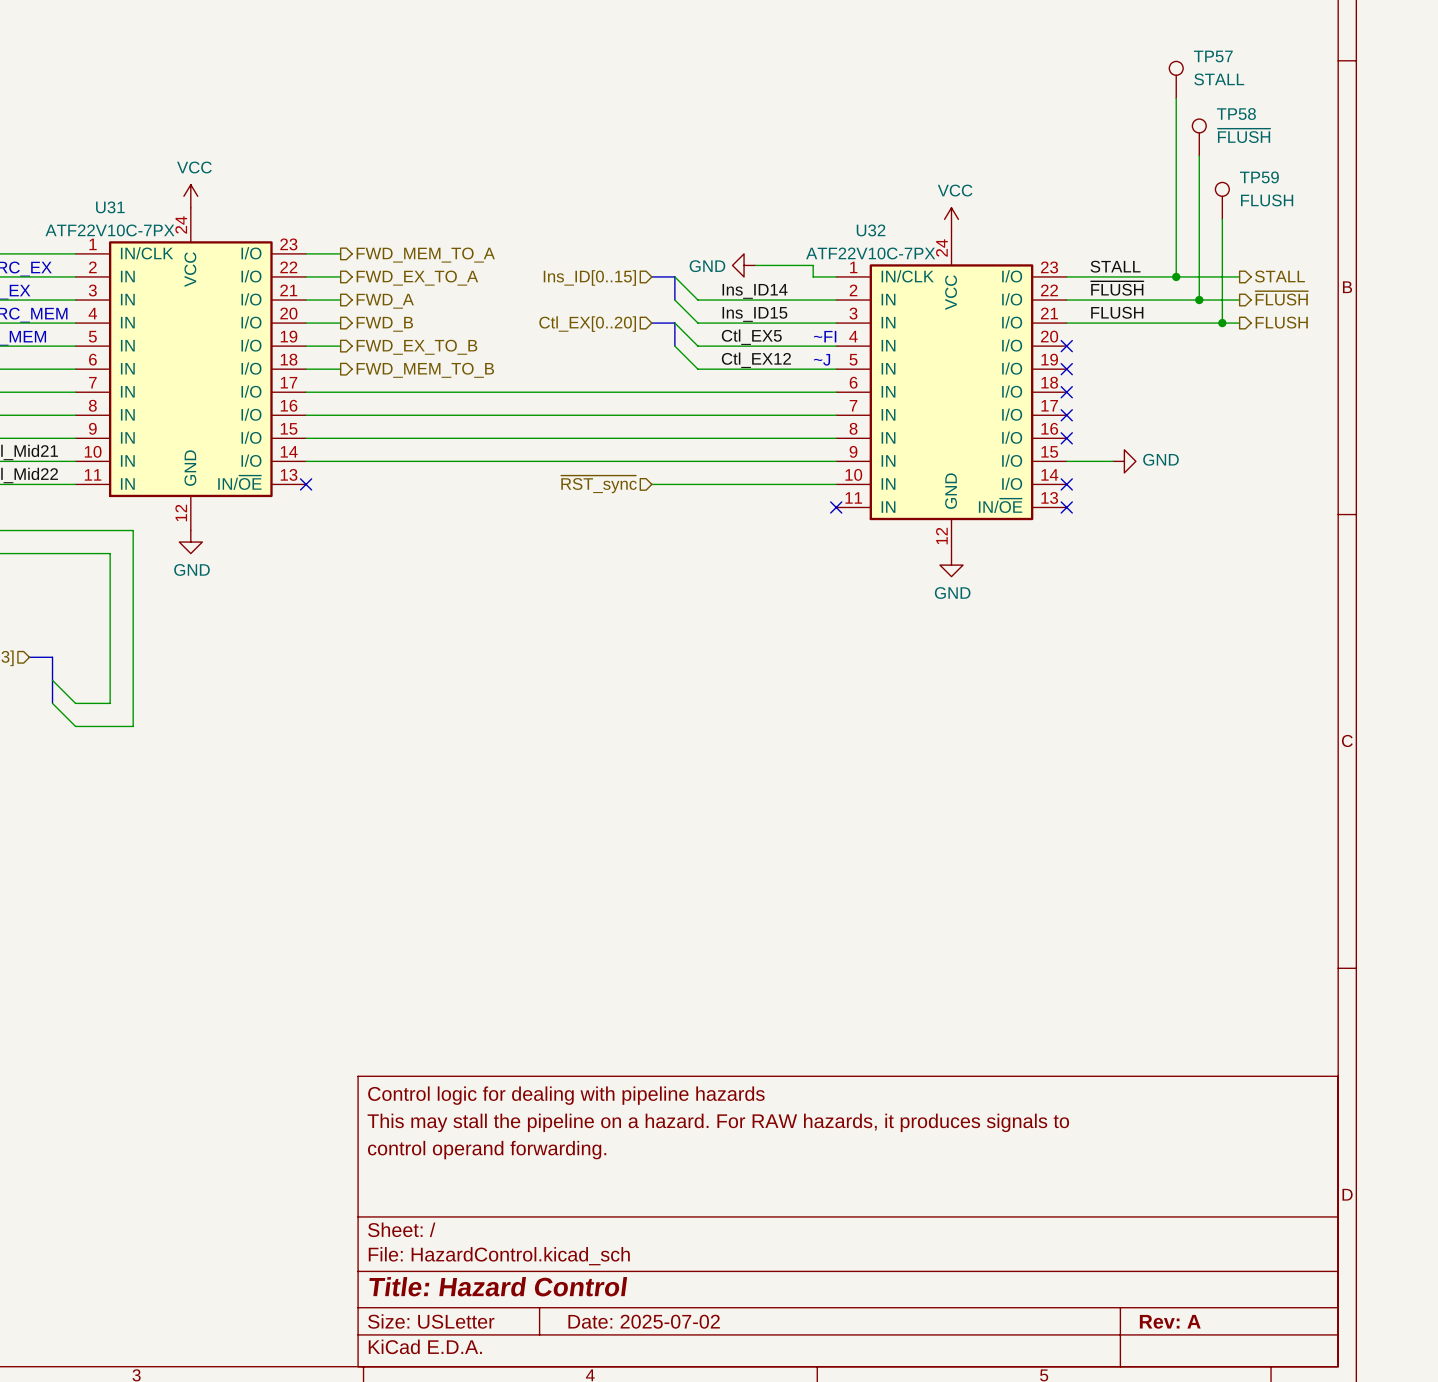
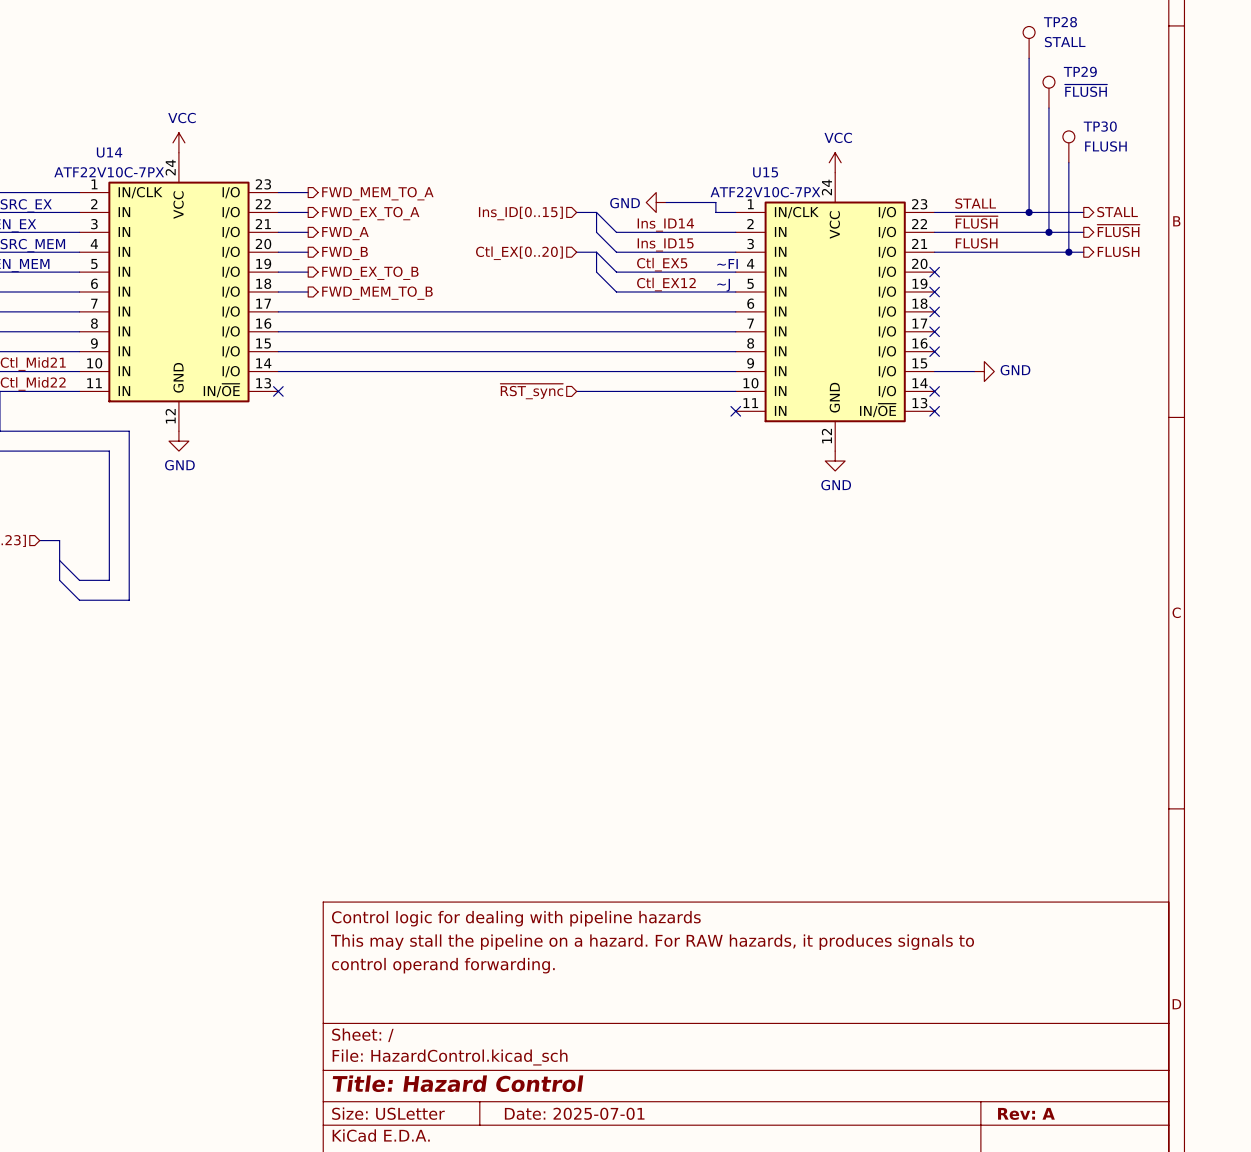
TP57 name: TP57 (1213, 56) -> TP28 (1060, 22)
TP58 name: TP58 (1236, 114) -> TP29 (1080, 71)
TP59 name: TP59 (1259, 177) -> TP30 (1100, 126)
U31 name: U31 (110, 207) -> U14 (109, 152)
U32 name: U32 (871, 230) -> U15 (765, 172)
title block: Date: 2025-07-02 (644, 1321) -> Date: 2025-07-01 (574, 1113)

